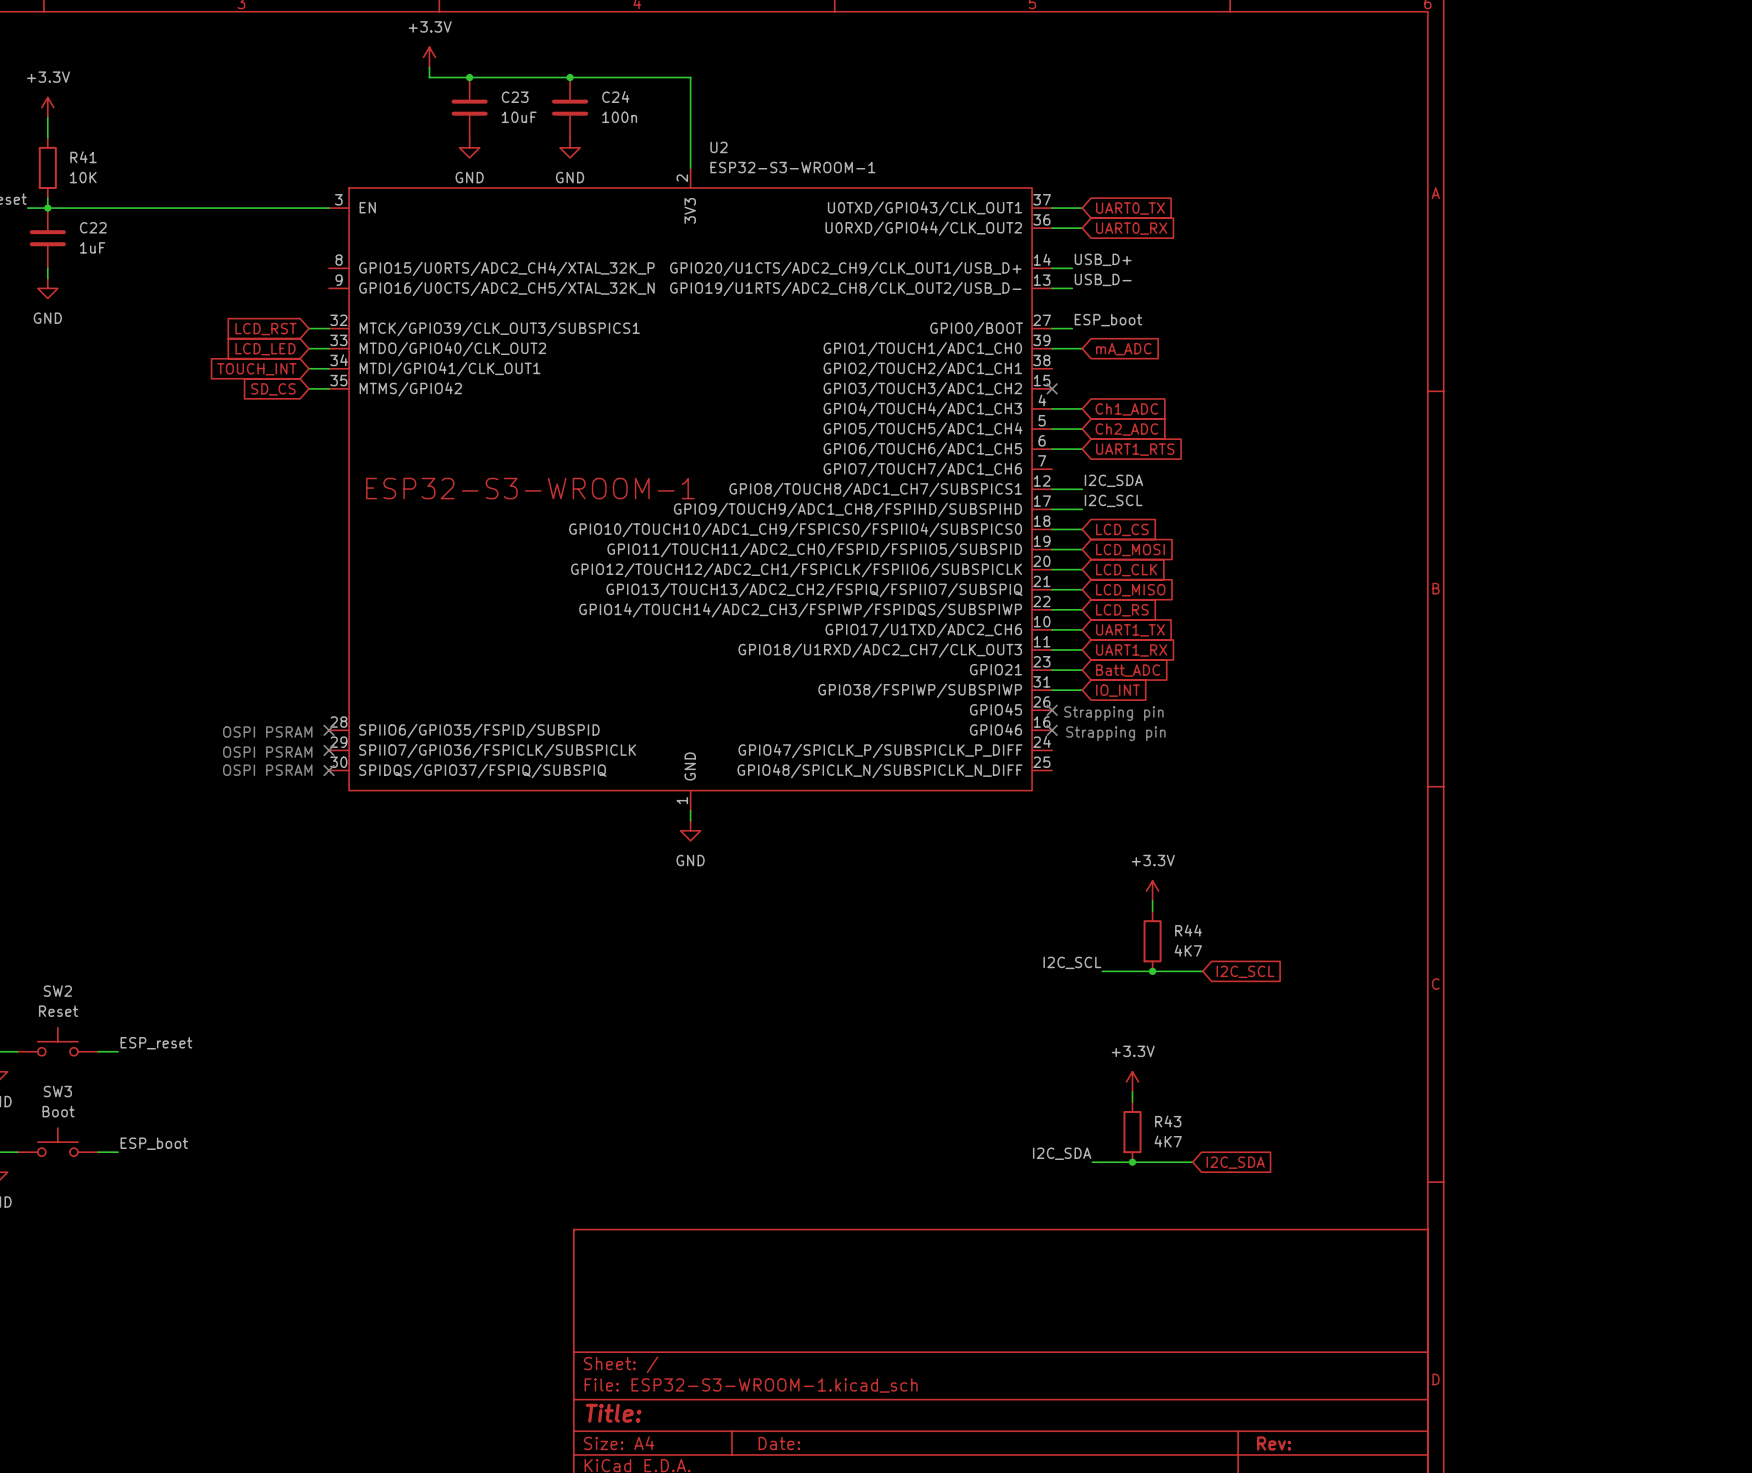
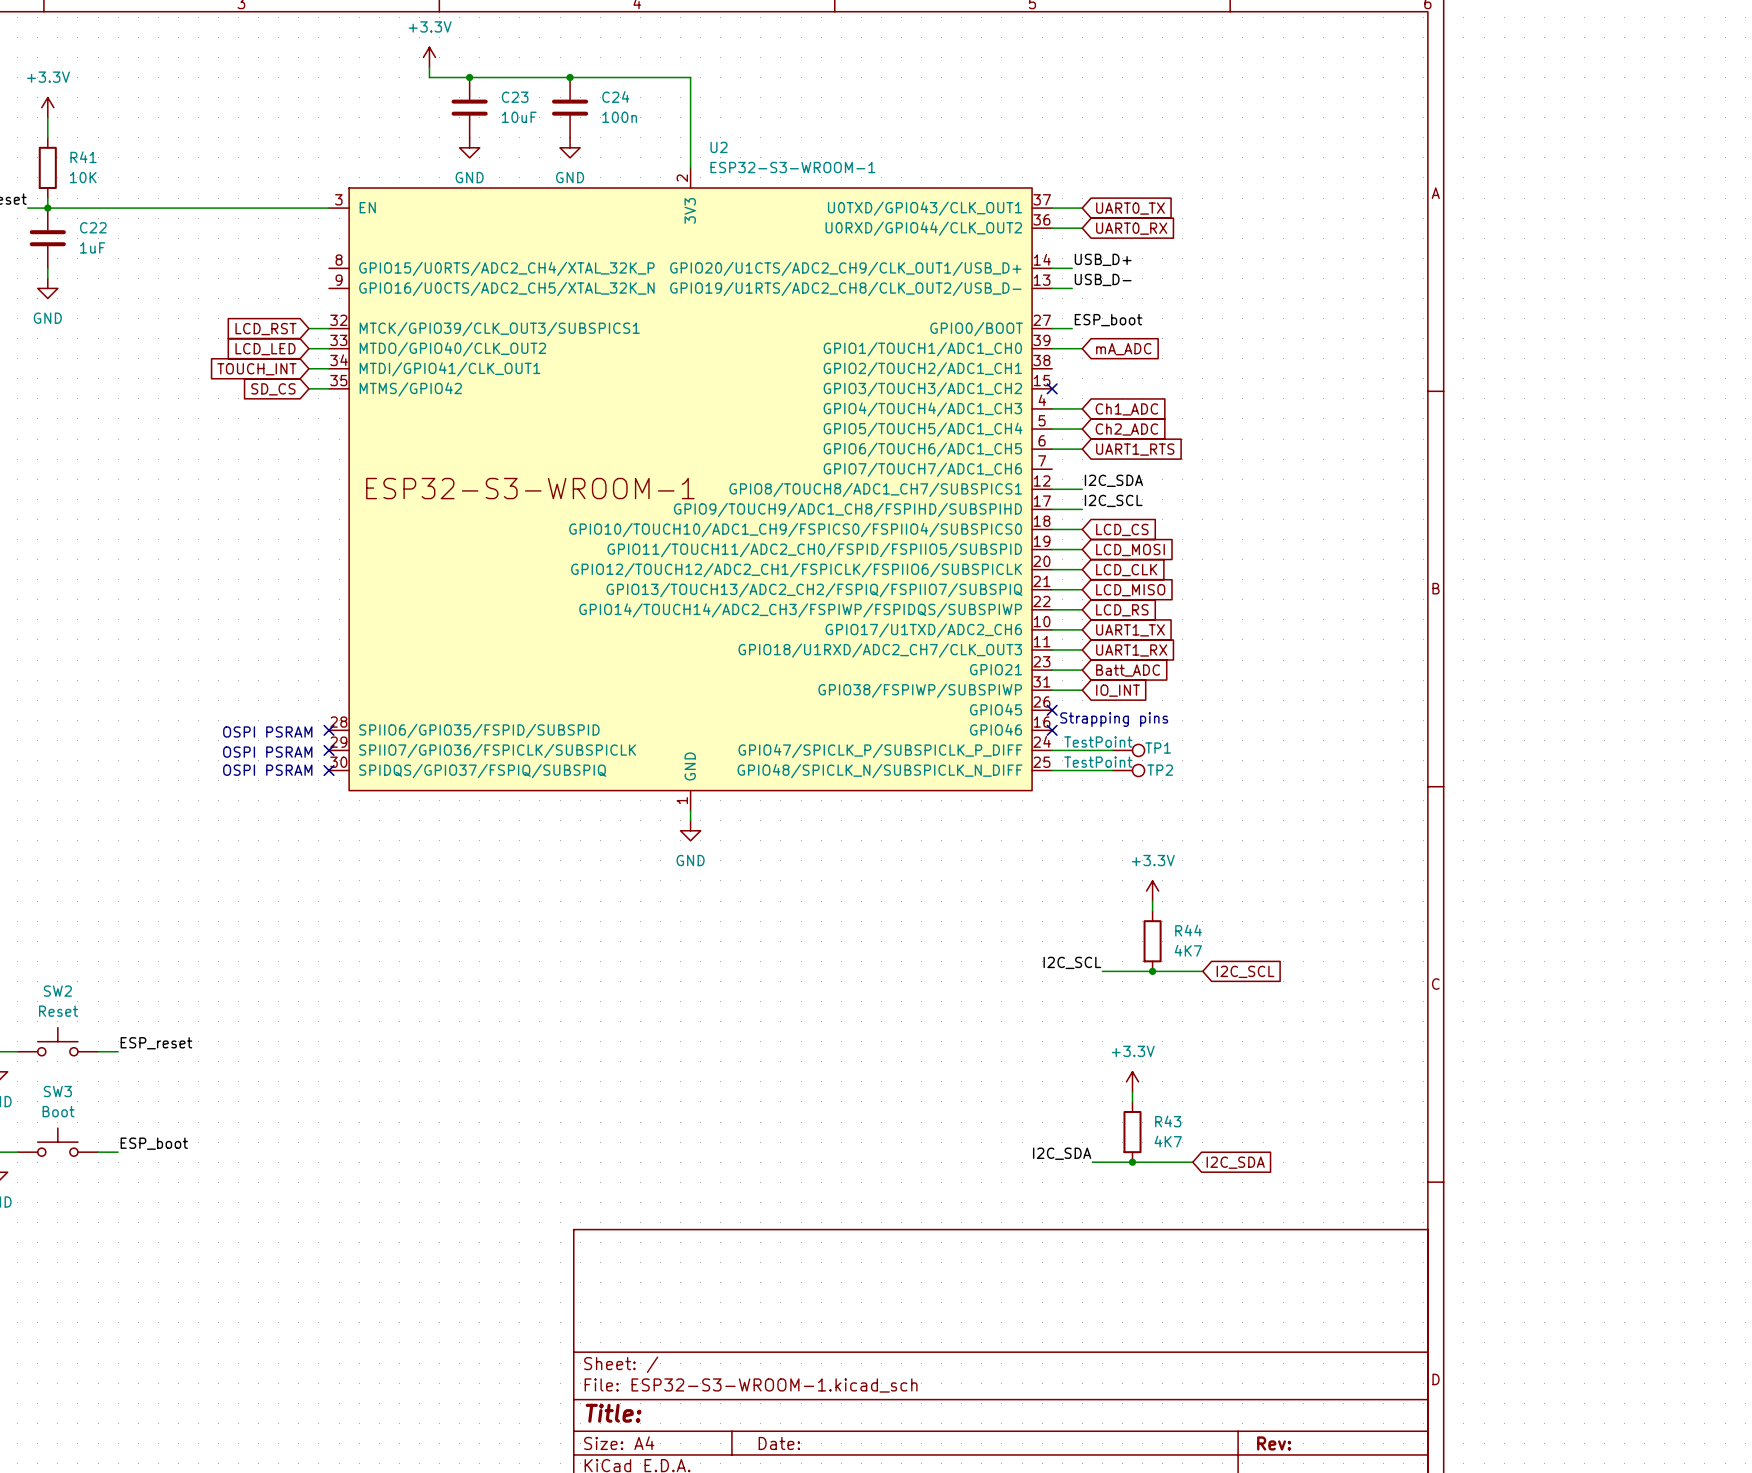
text: Strapping pin (1113, 713) -> Strapping pins (1114, 719)
text: Strapping pin (1115, 733) -> none
wire: none -> (1052, 750) (1112, 750)
TP1: none -> TestPoint (1128, 750)
wire: none -> (1052, 770) (1112, 770)
TP2: none -> TestPoint (1128, 770)

